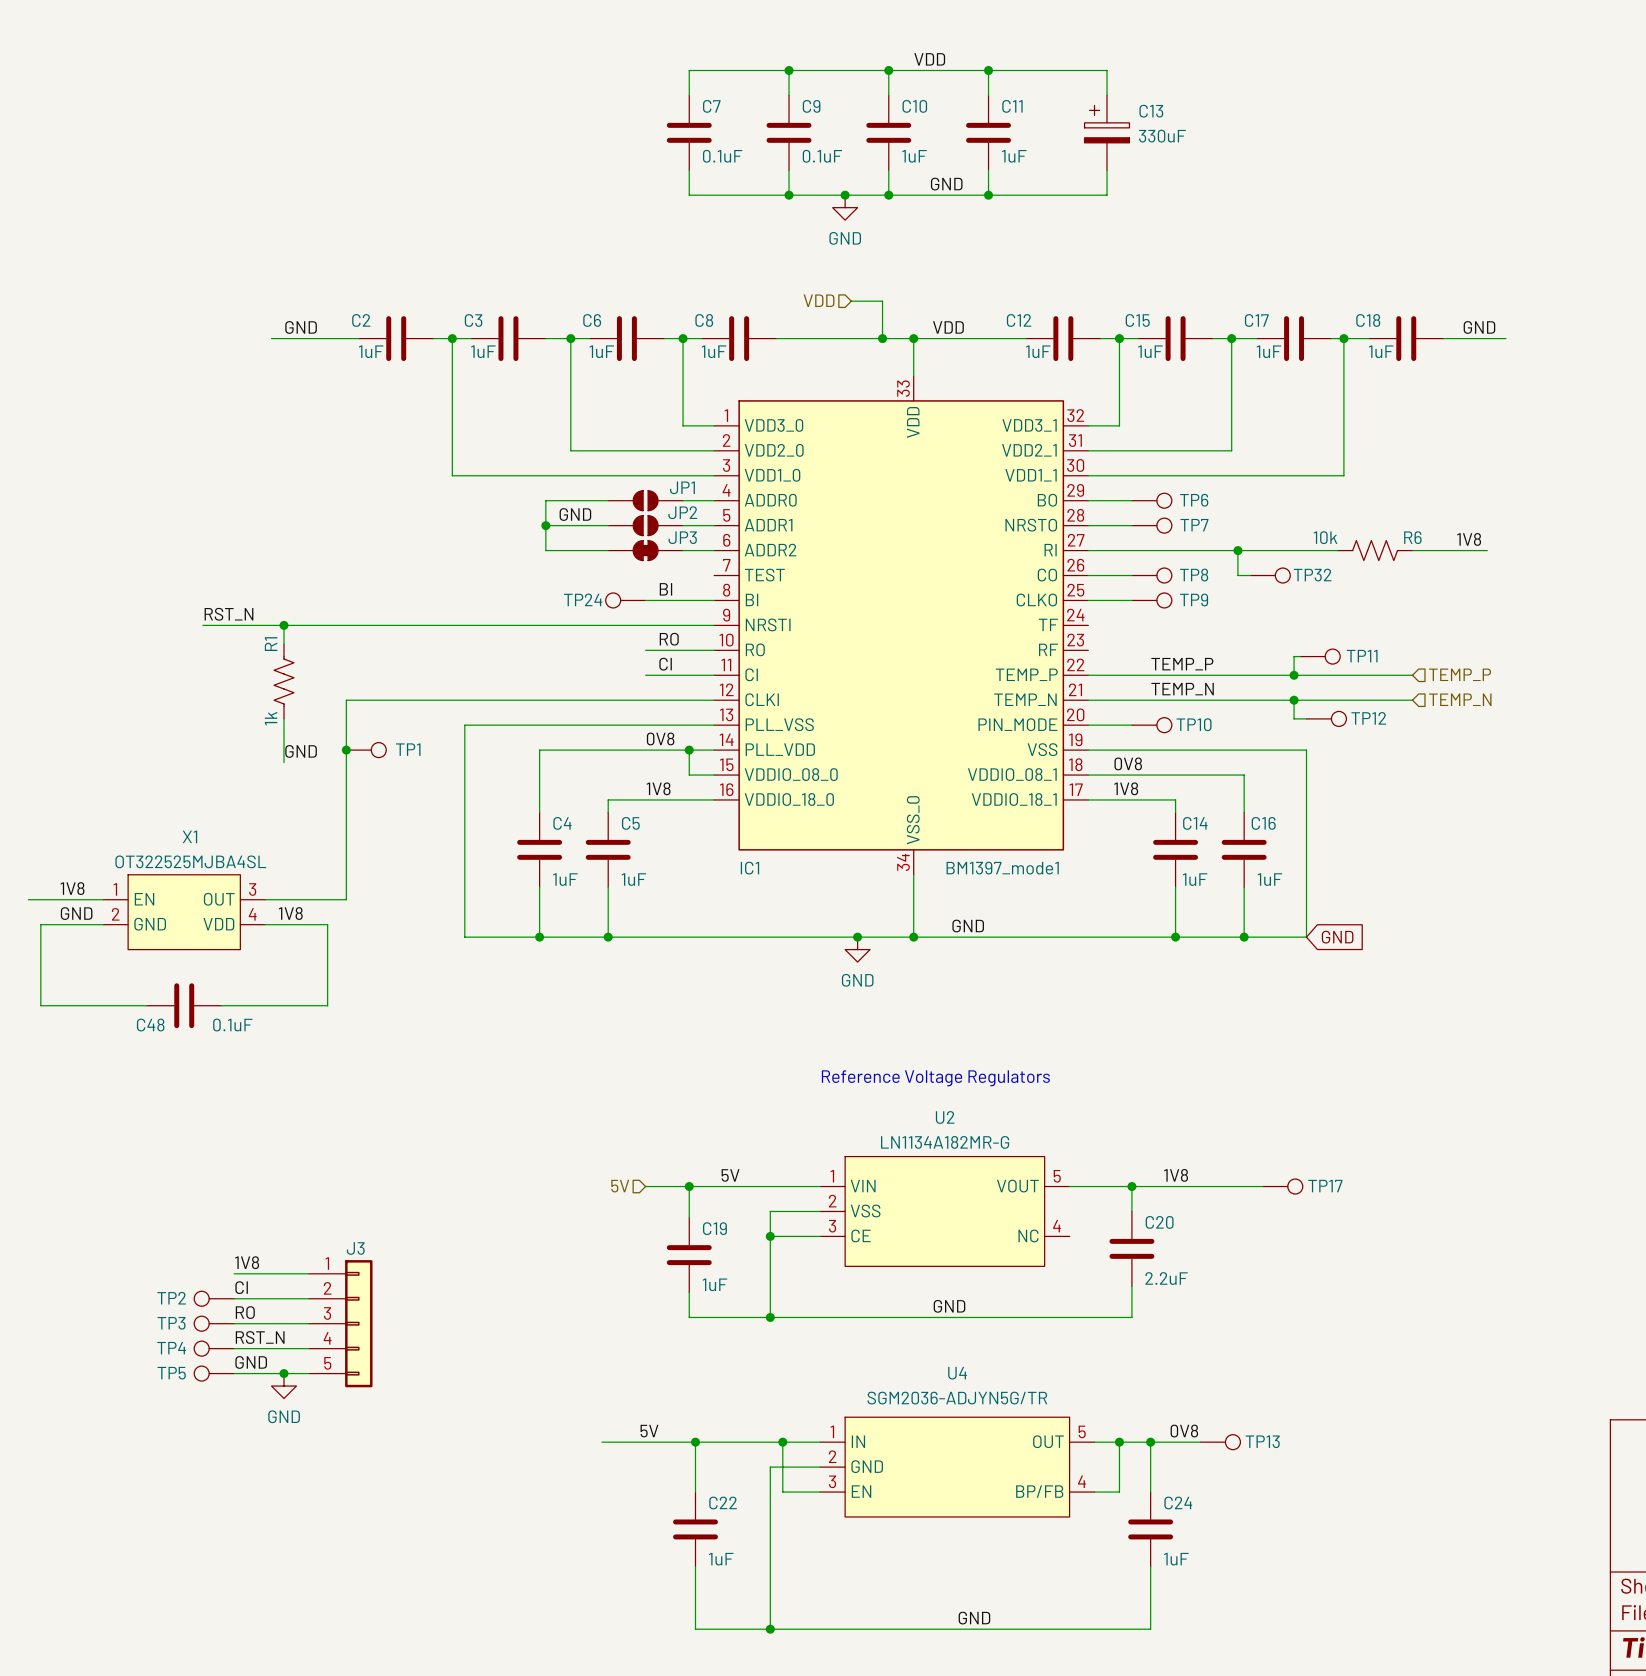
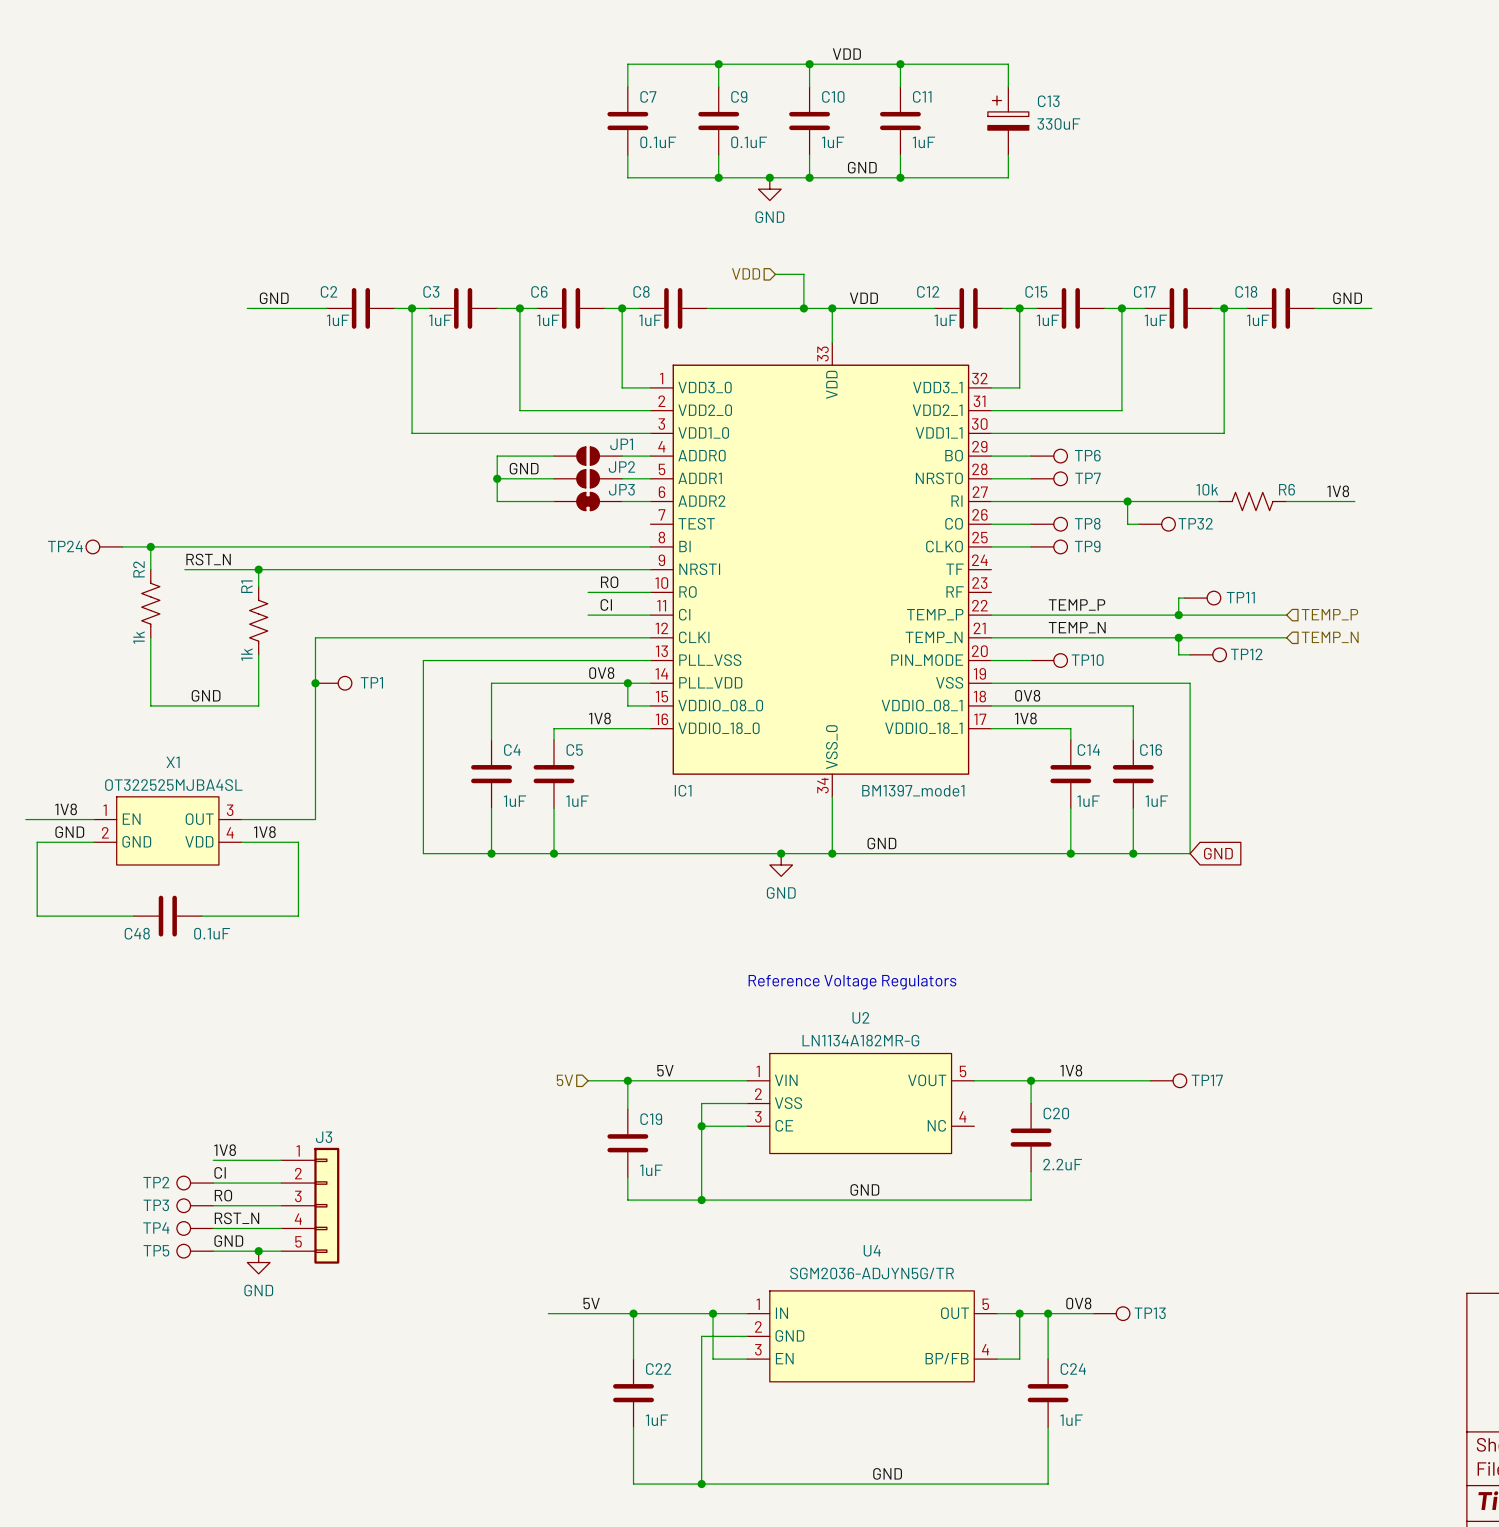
label: BI (665, 589) -> none
wire: none -> (122, 546) (588, 546)
wire: none -> (150, 546) (150, 569)
junction: none -> (150, 546)
TP24 position: (625, 600) -> (104, 546)
R2: none -> 1k (150, 603)
wire: none -> (150, 637) (150, 705) (258, 705) (258, 694)
label position: GND (301, 751) -> GND (206, 695)

